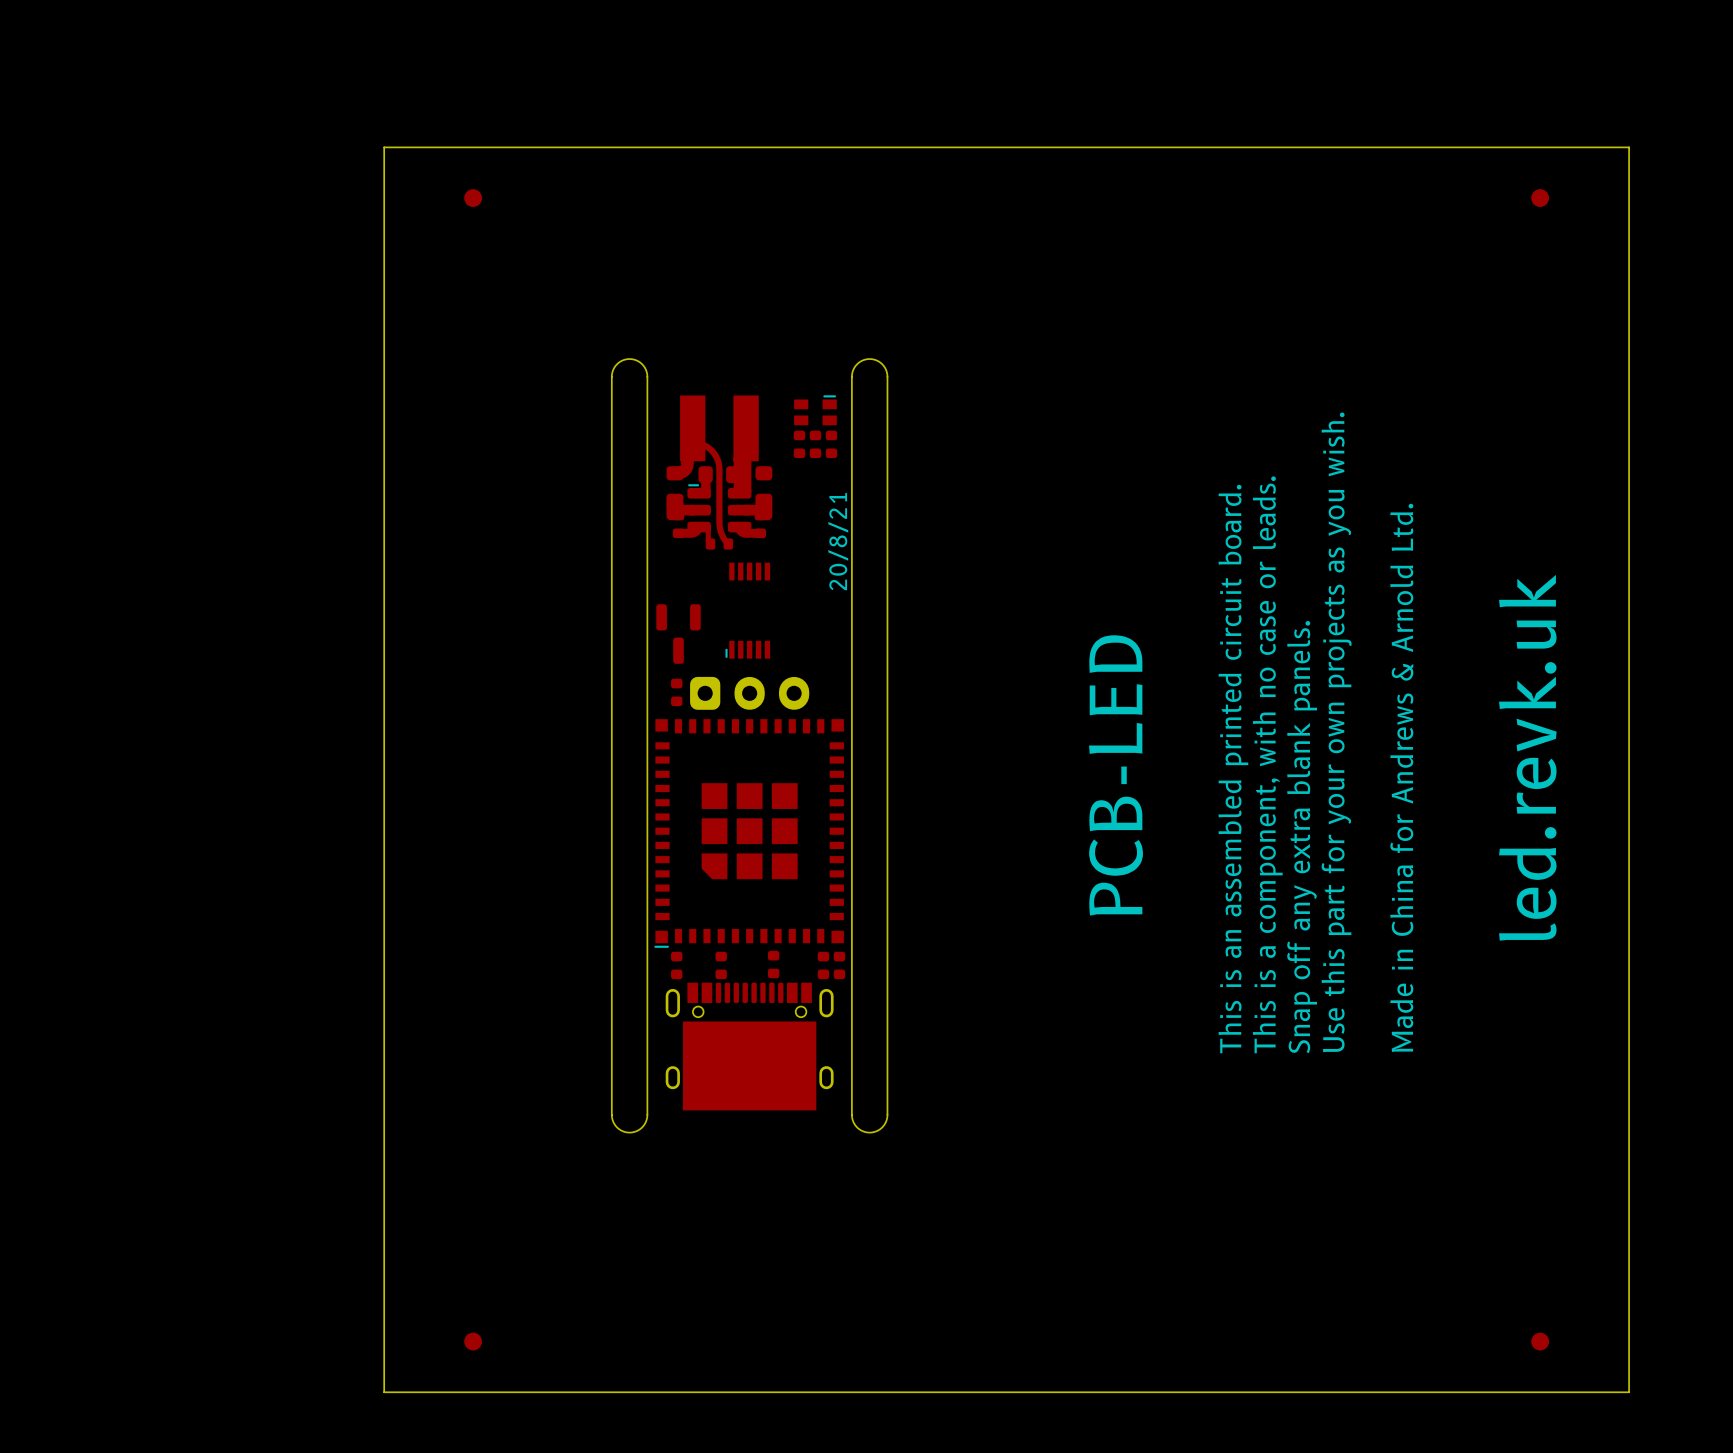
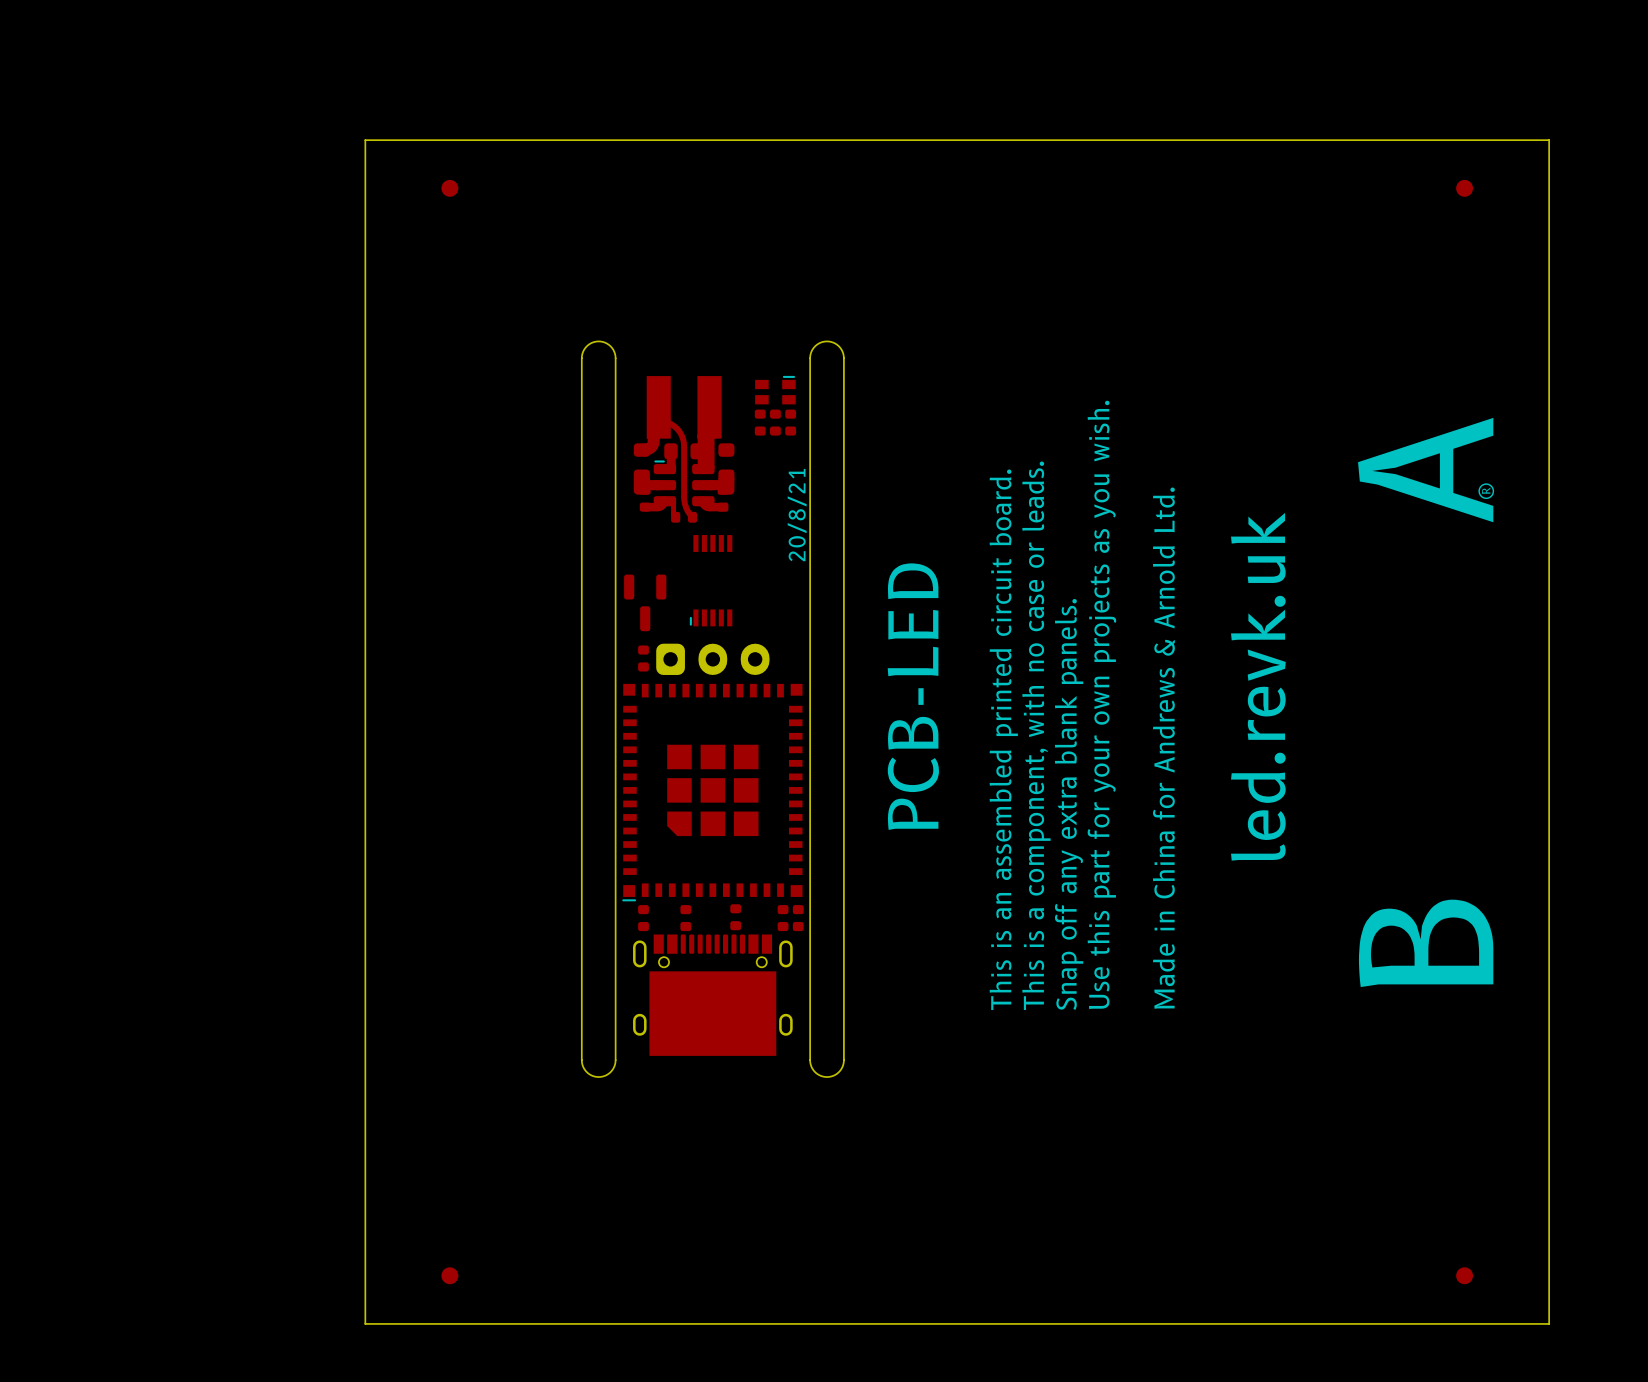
text: none -> A (1425, 470)
text: none -> ® (1486, 491)
text position: Use this part for your own projects as you wish. (1336, 732) -> Use this part for your own projects as you wish. (1101, 704)
text position: led.revk.uk (1527, 757) -> led.revk.uk (1258, 686)
text position: This is a component, with no case or leads. (1267, 764) -> This is a component, with no case or leads. (1036, 735)
text: This is an assembled printed circuit board. (1233, 769) -> Made in China for Andrews & Arnold Ltd. (1163, 748)
text position: PCB-LED (1115, 775) -> PCB-LED (913, 696)
text: none -> This is an assembled printed circuit board. (1003, 739)
text: Made in China for Andrews & Arnold Ltd. (1401, 777) -> none
text position: Snap off any extra blank panels. (1302, 837) -> Snap off any extra blank panels. (1069, 804)
text: none -> B (1426, 943)

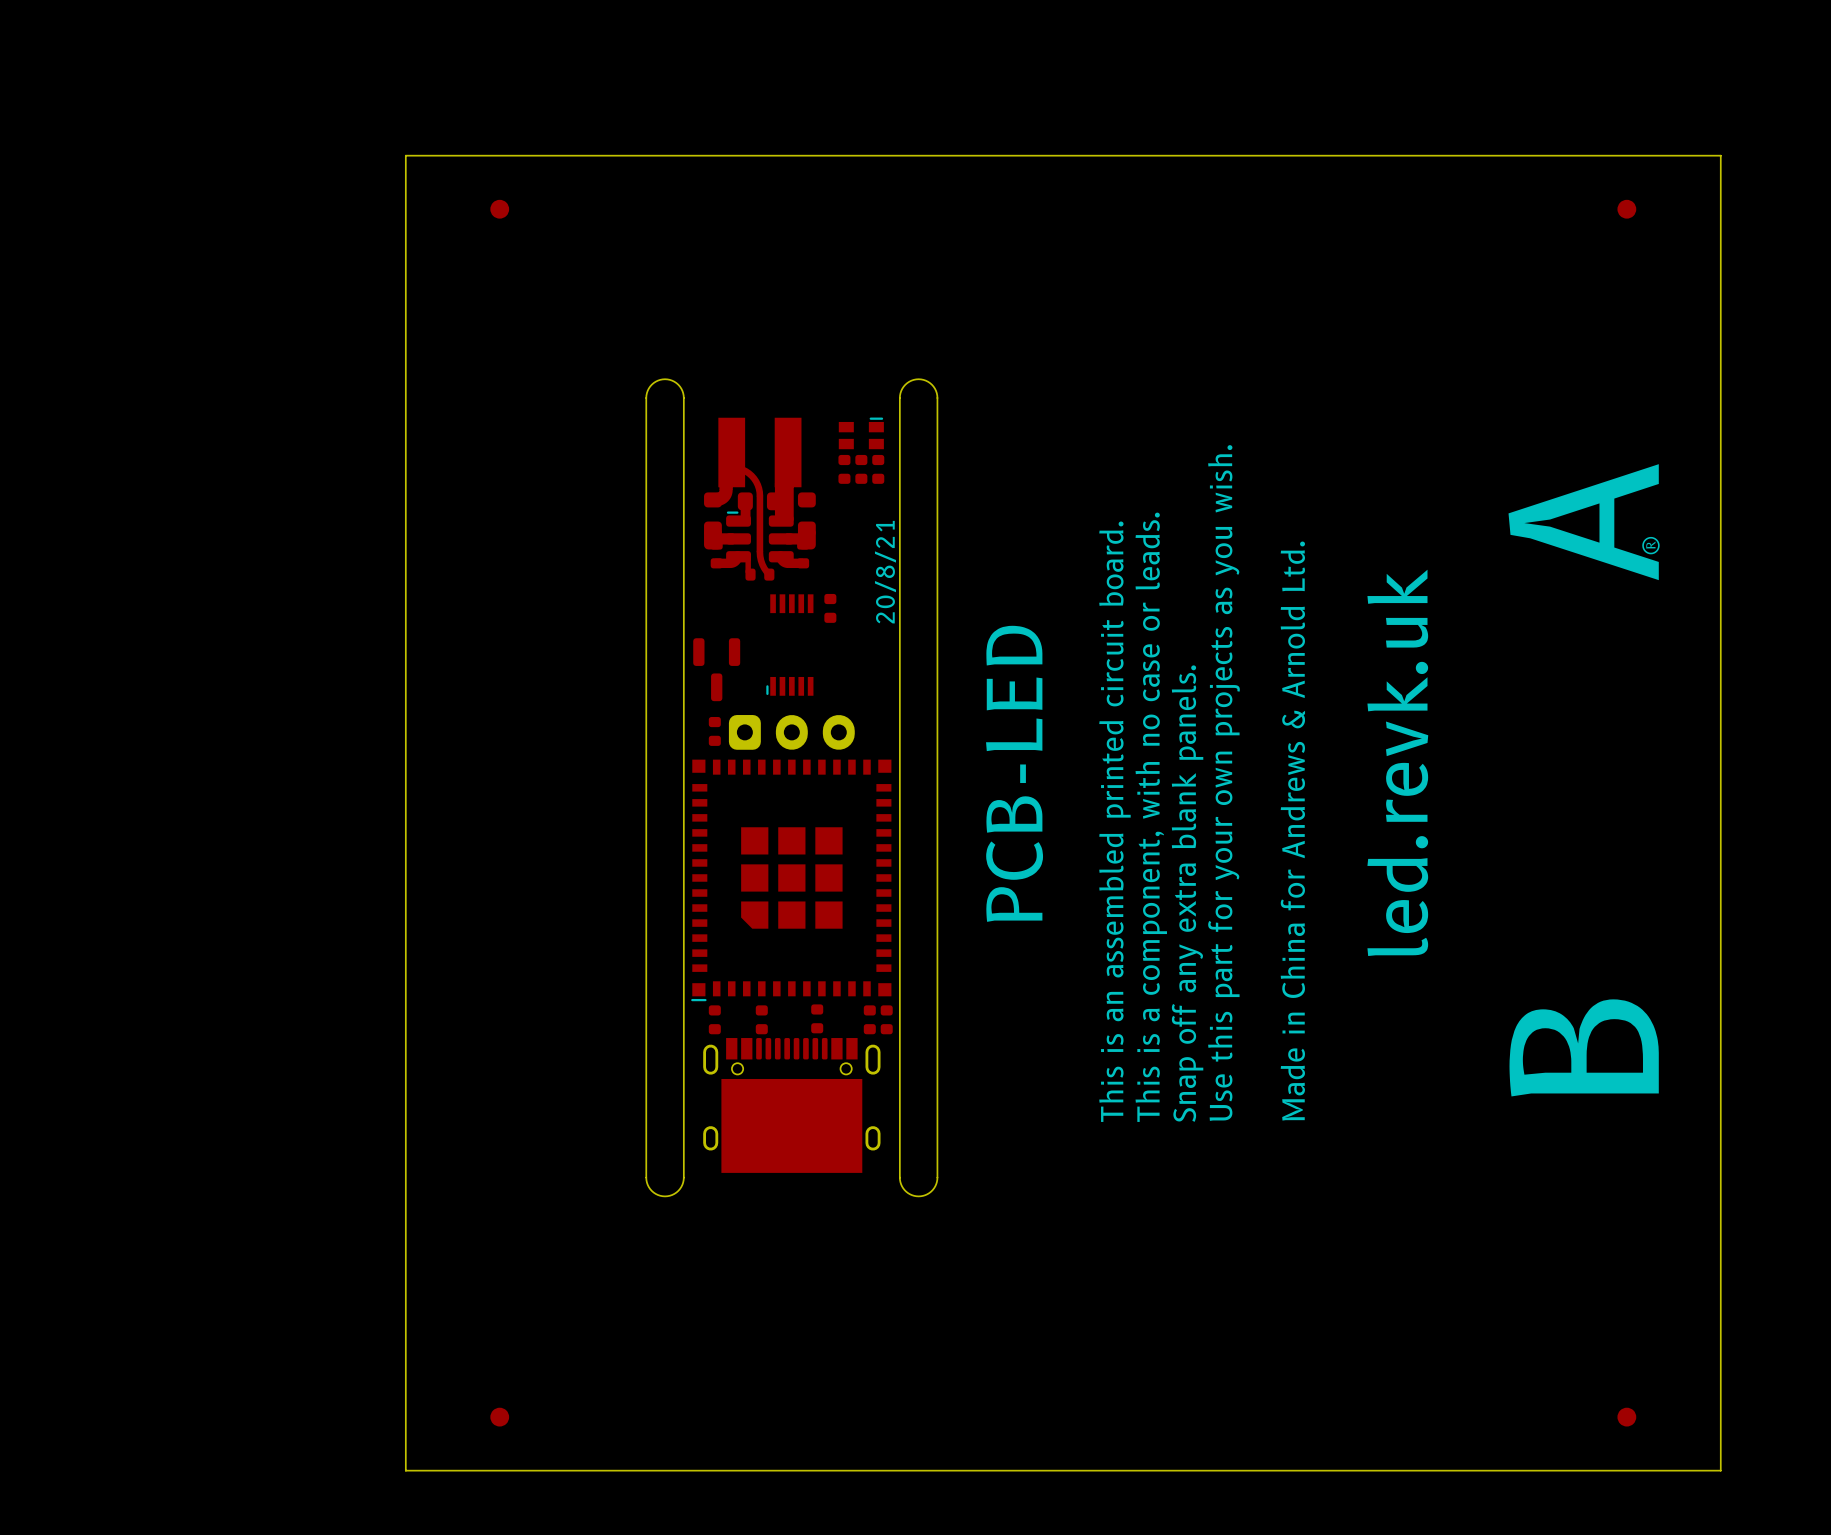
part: none -> (830, 608)

